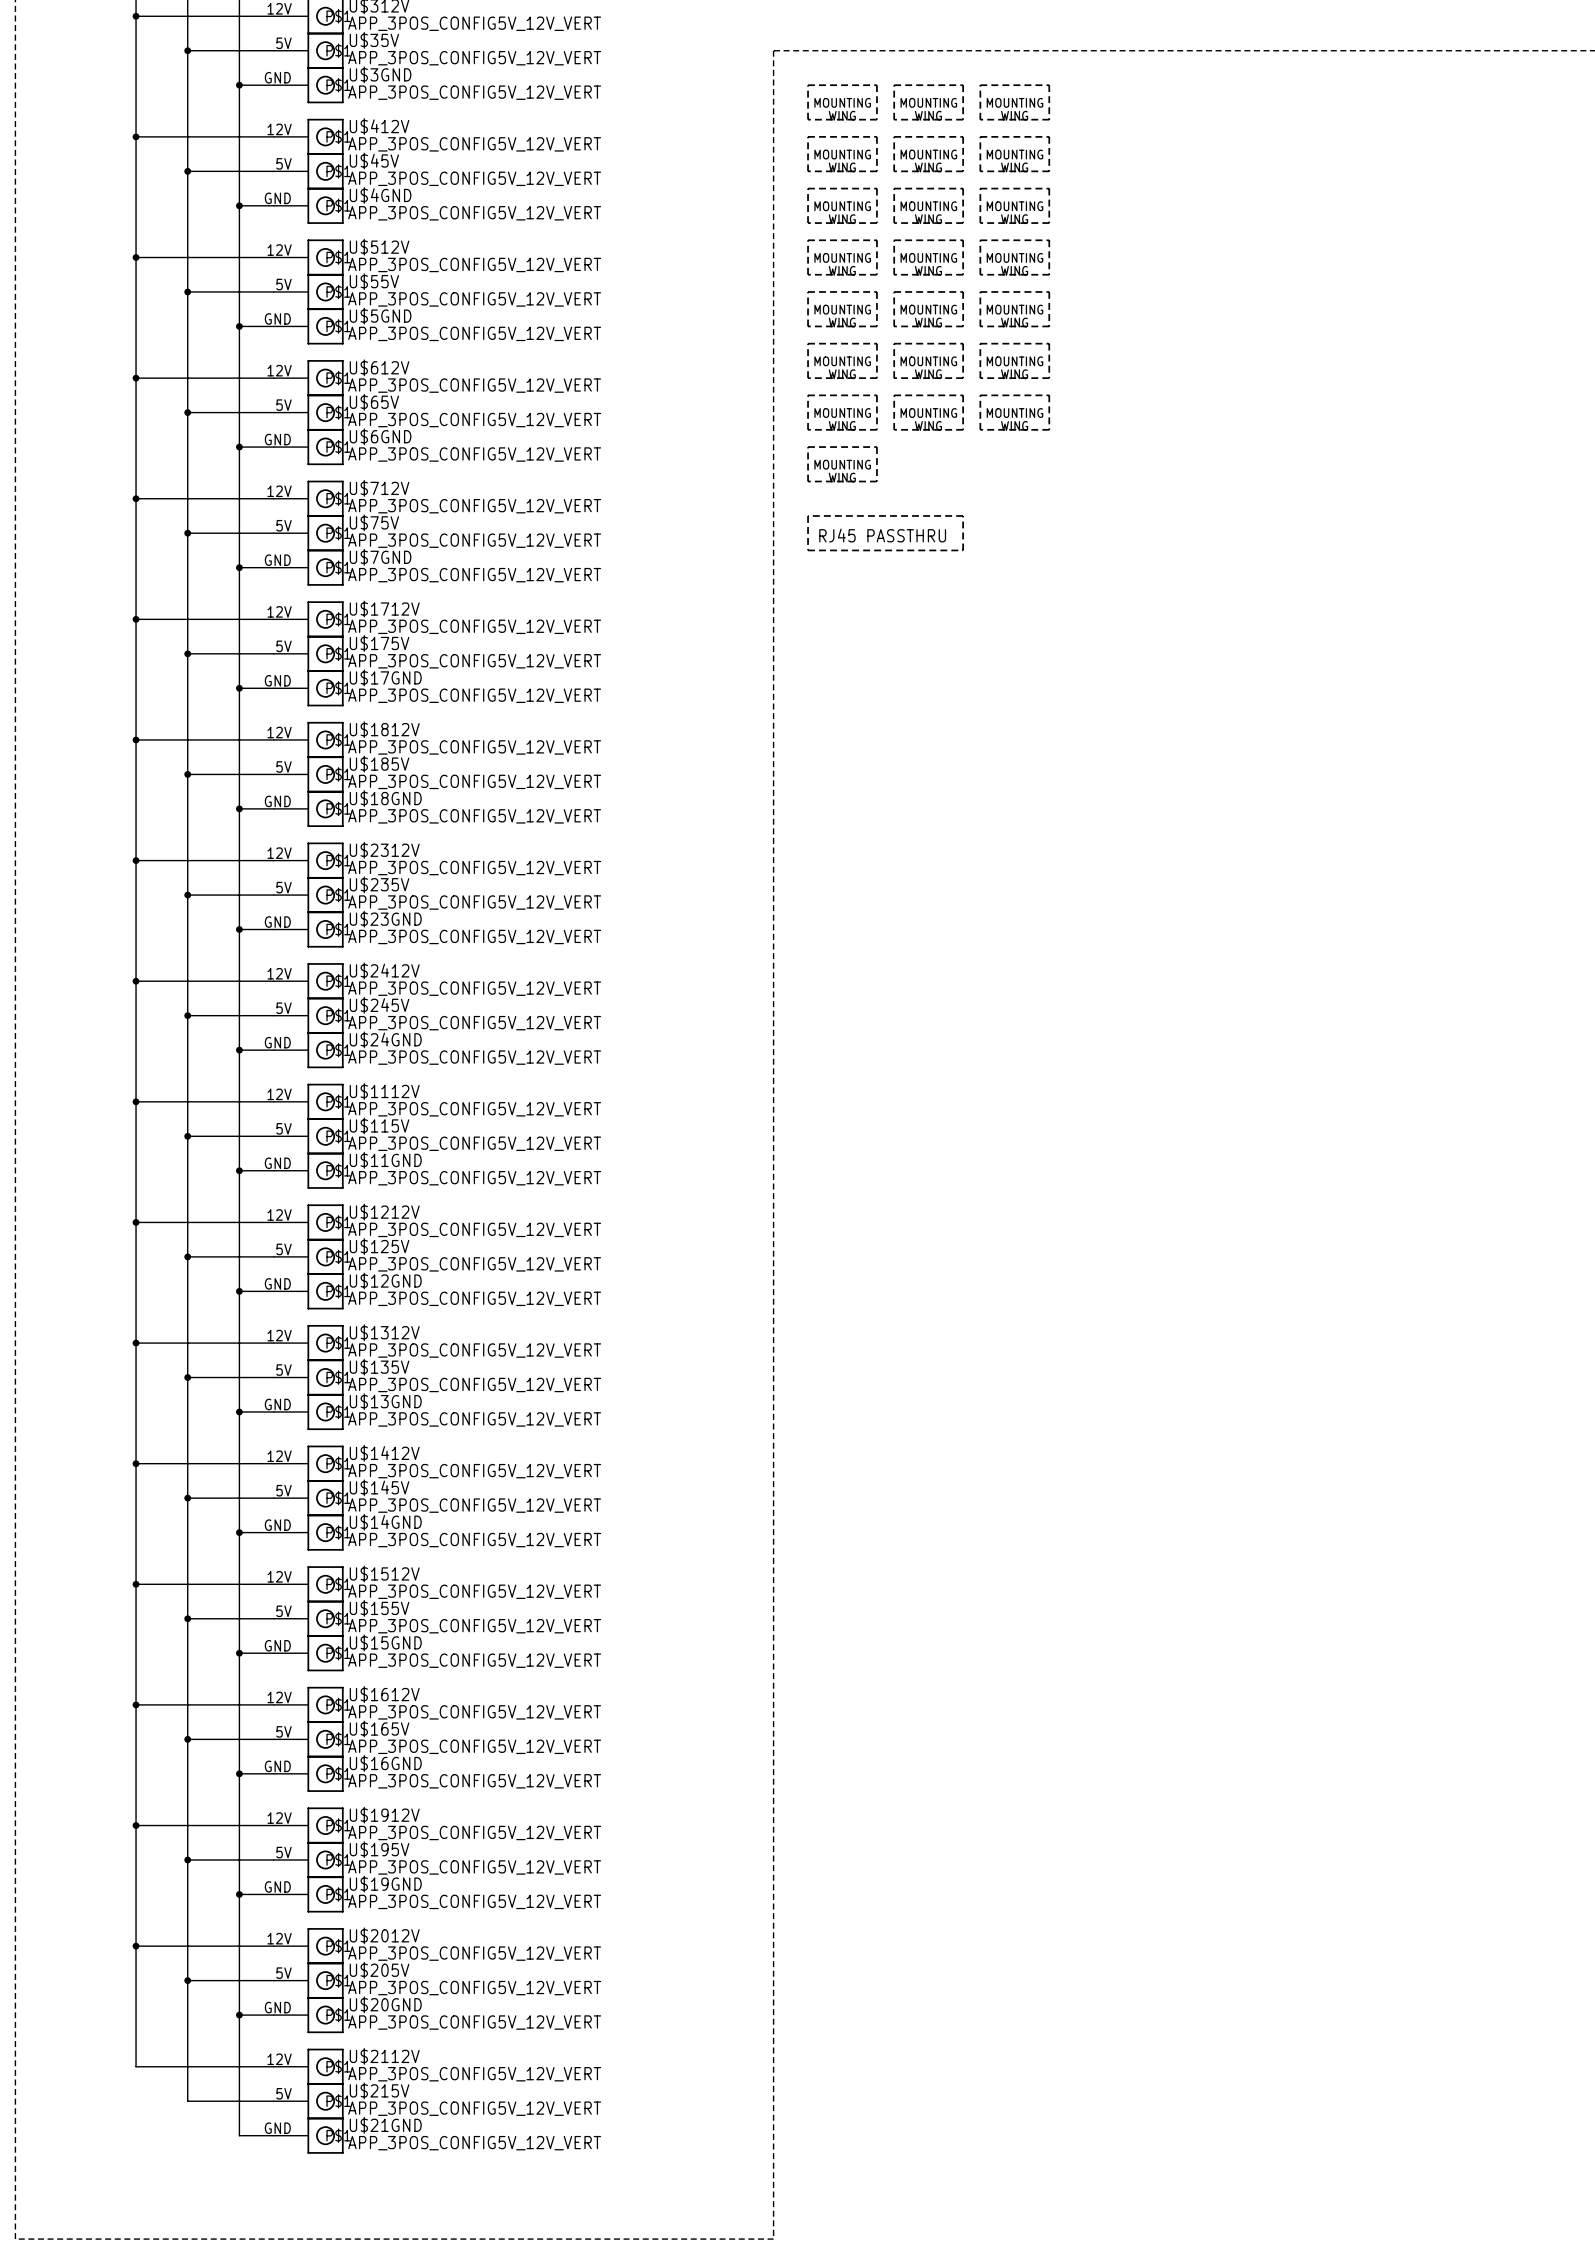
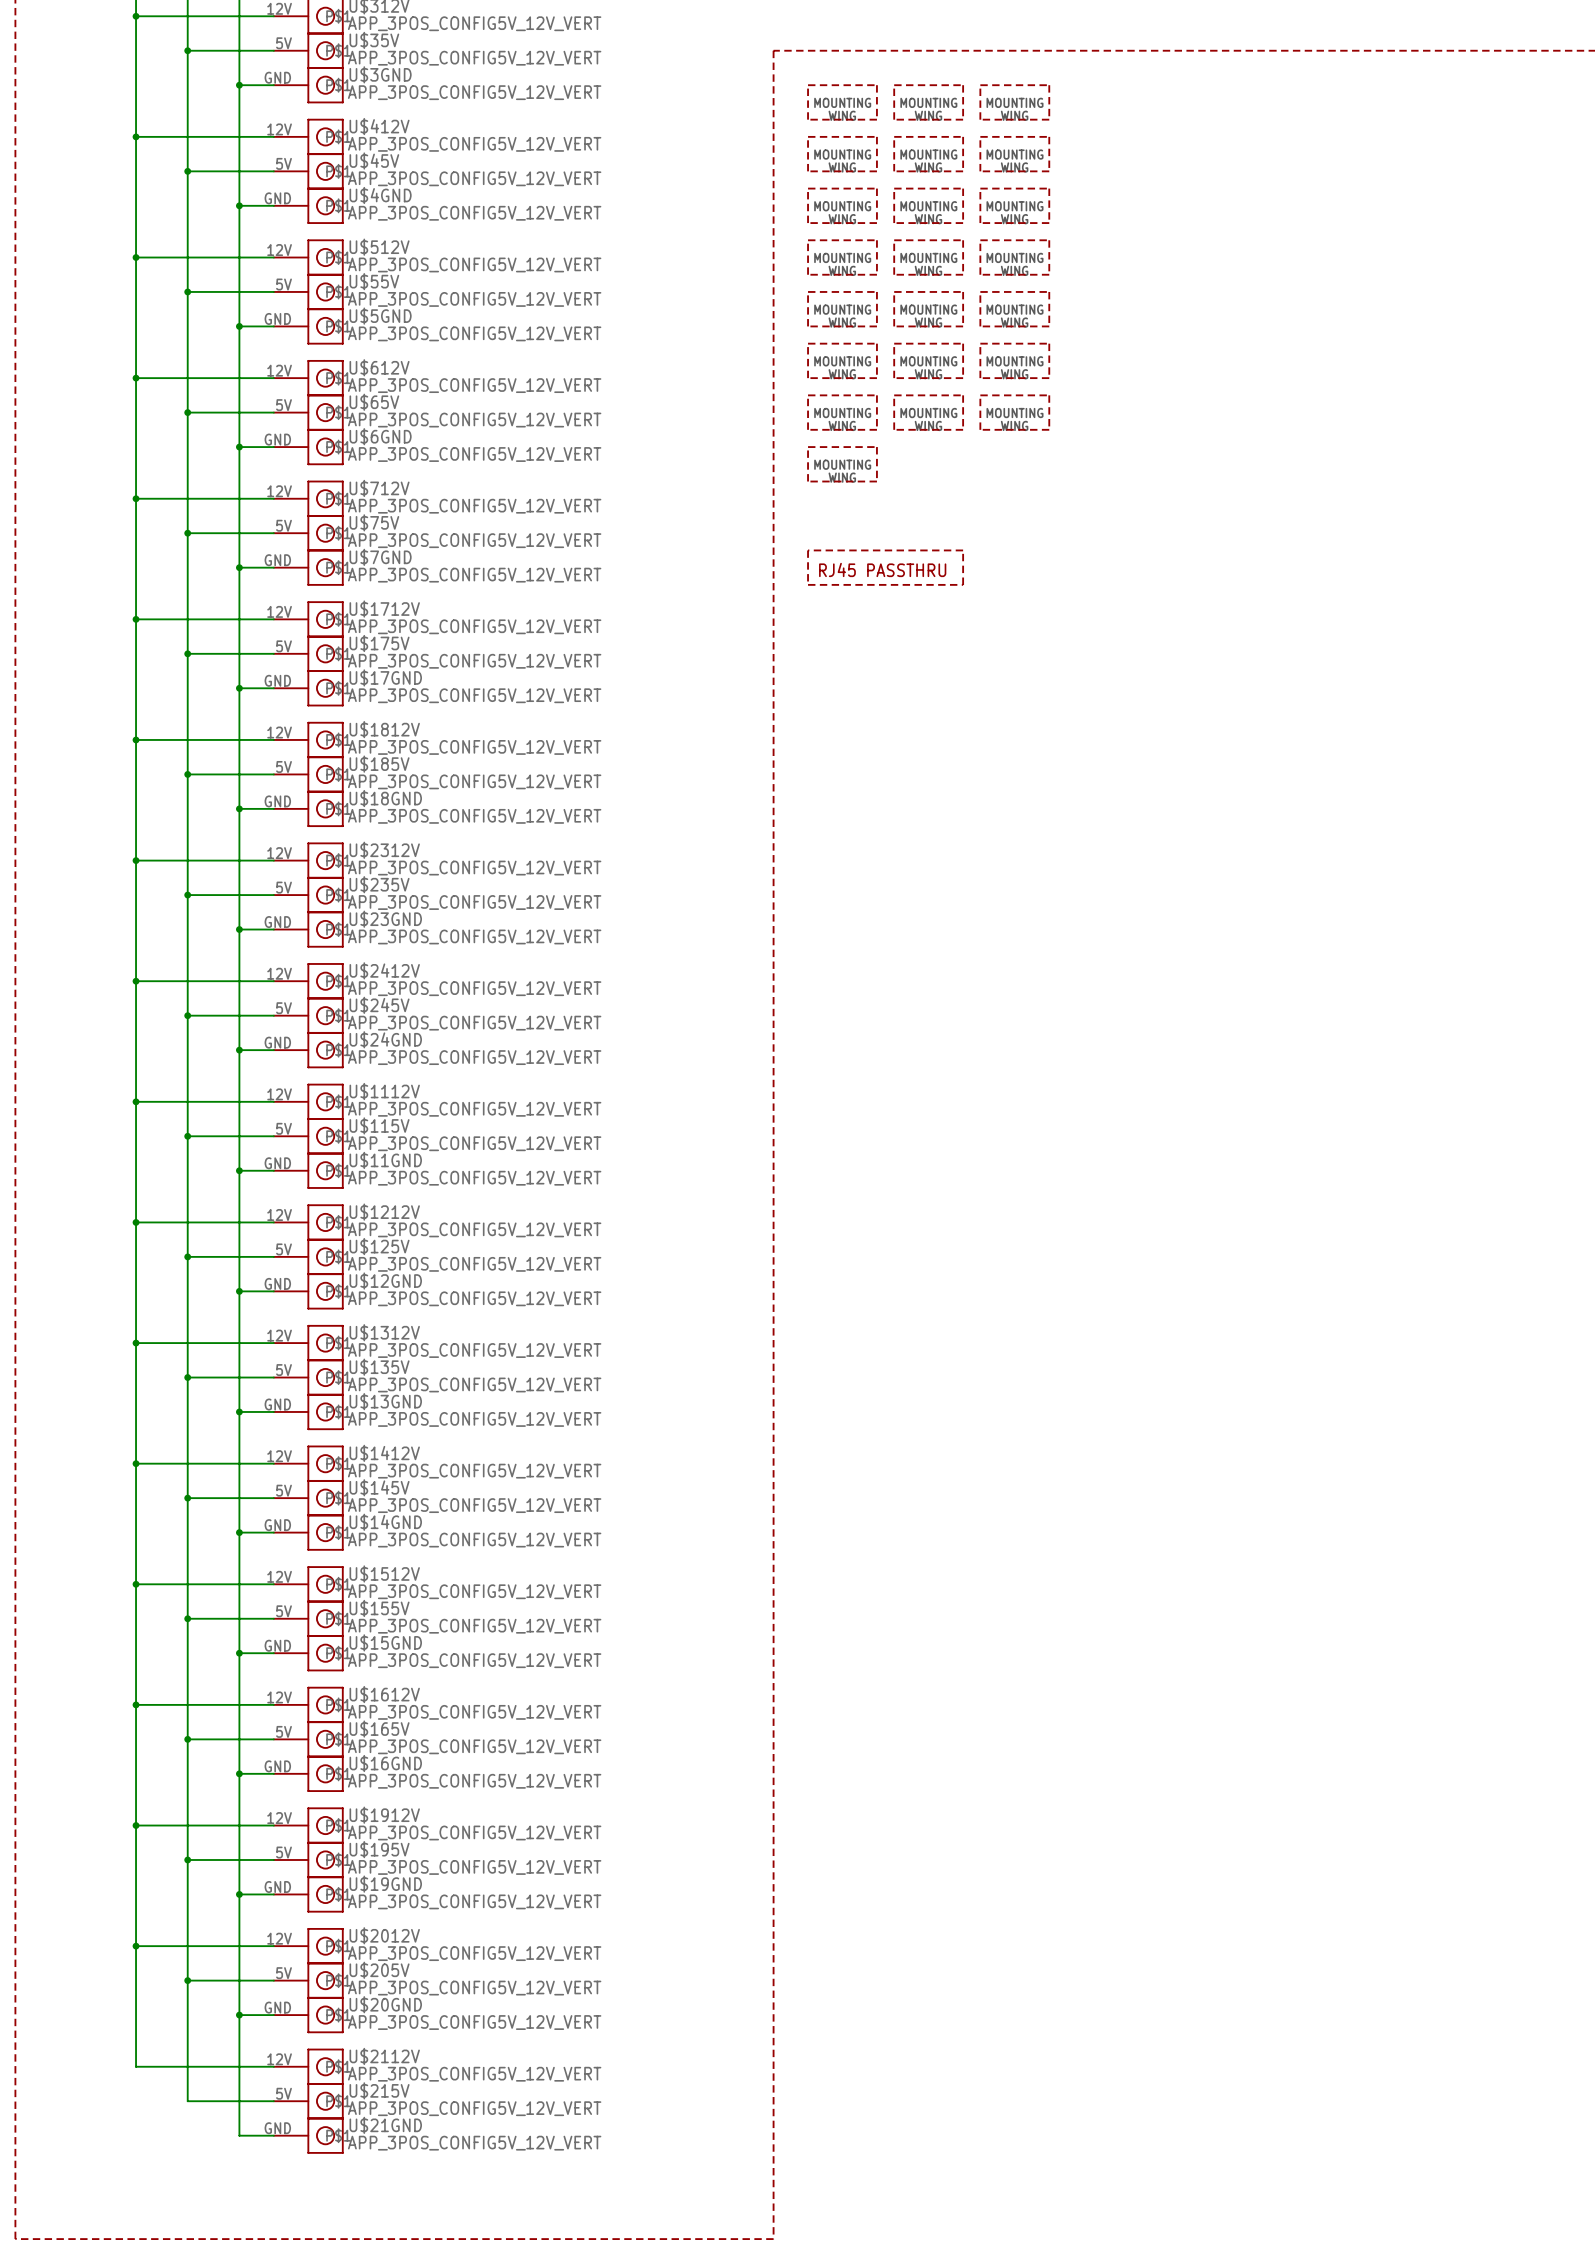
part position: (885, 533) -> (885, 567)

